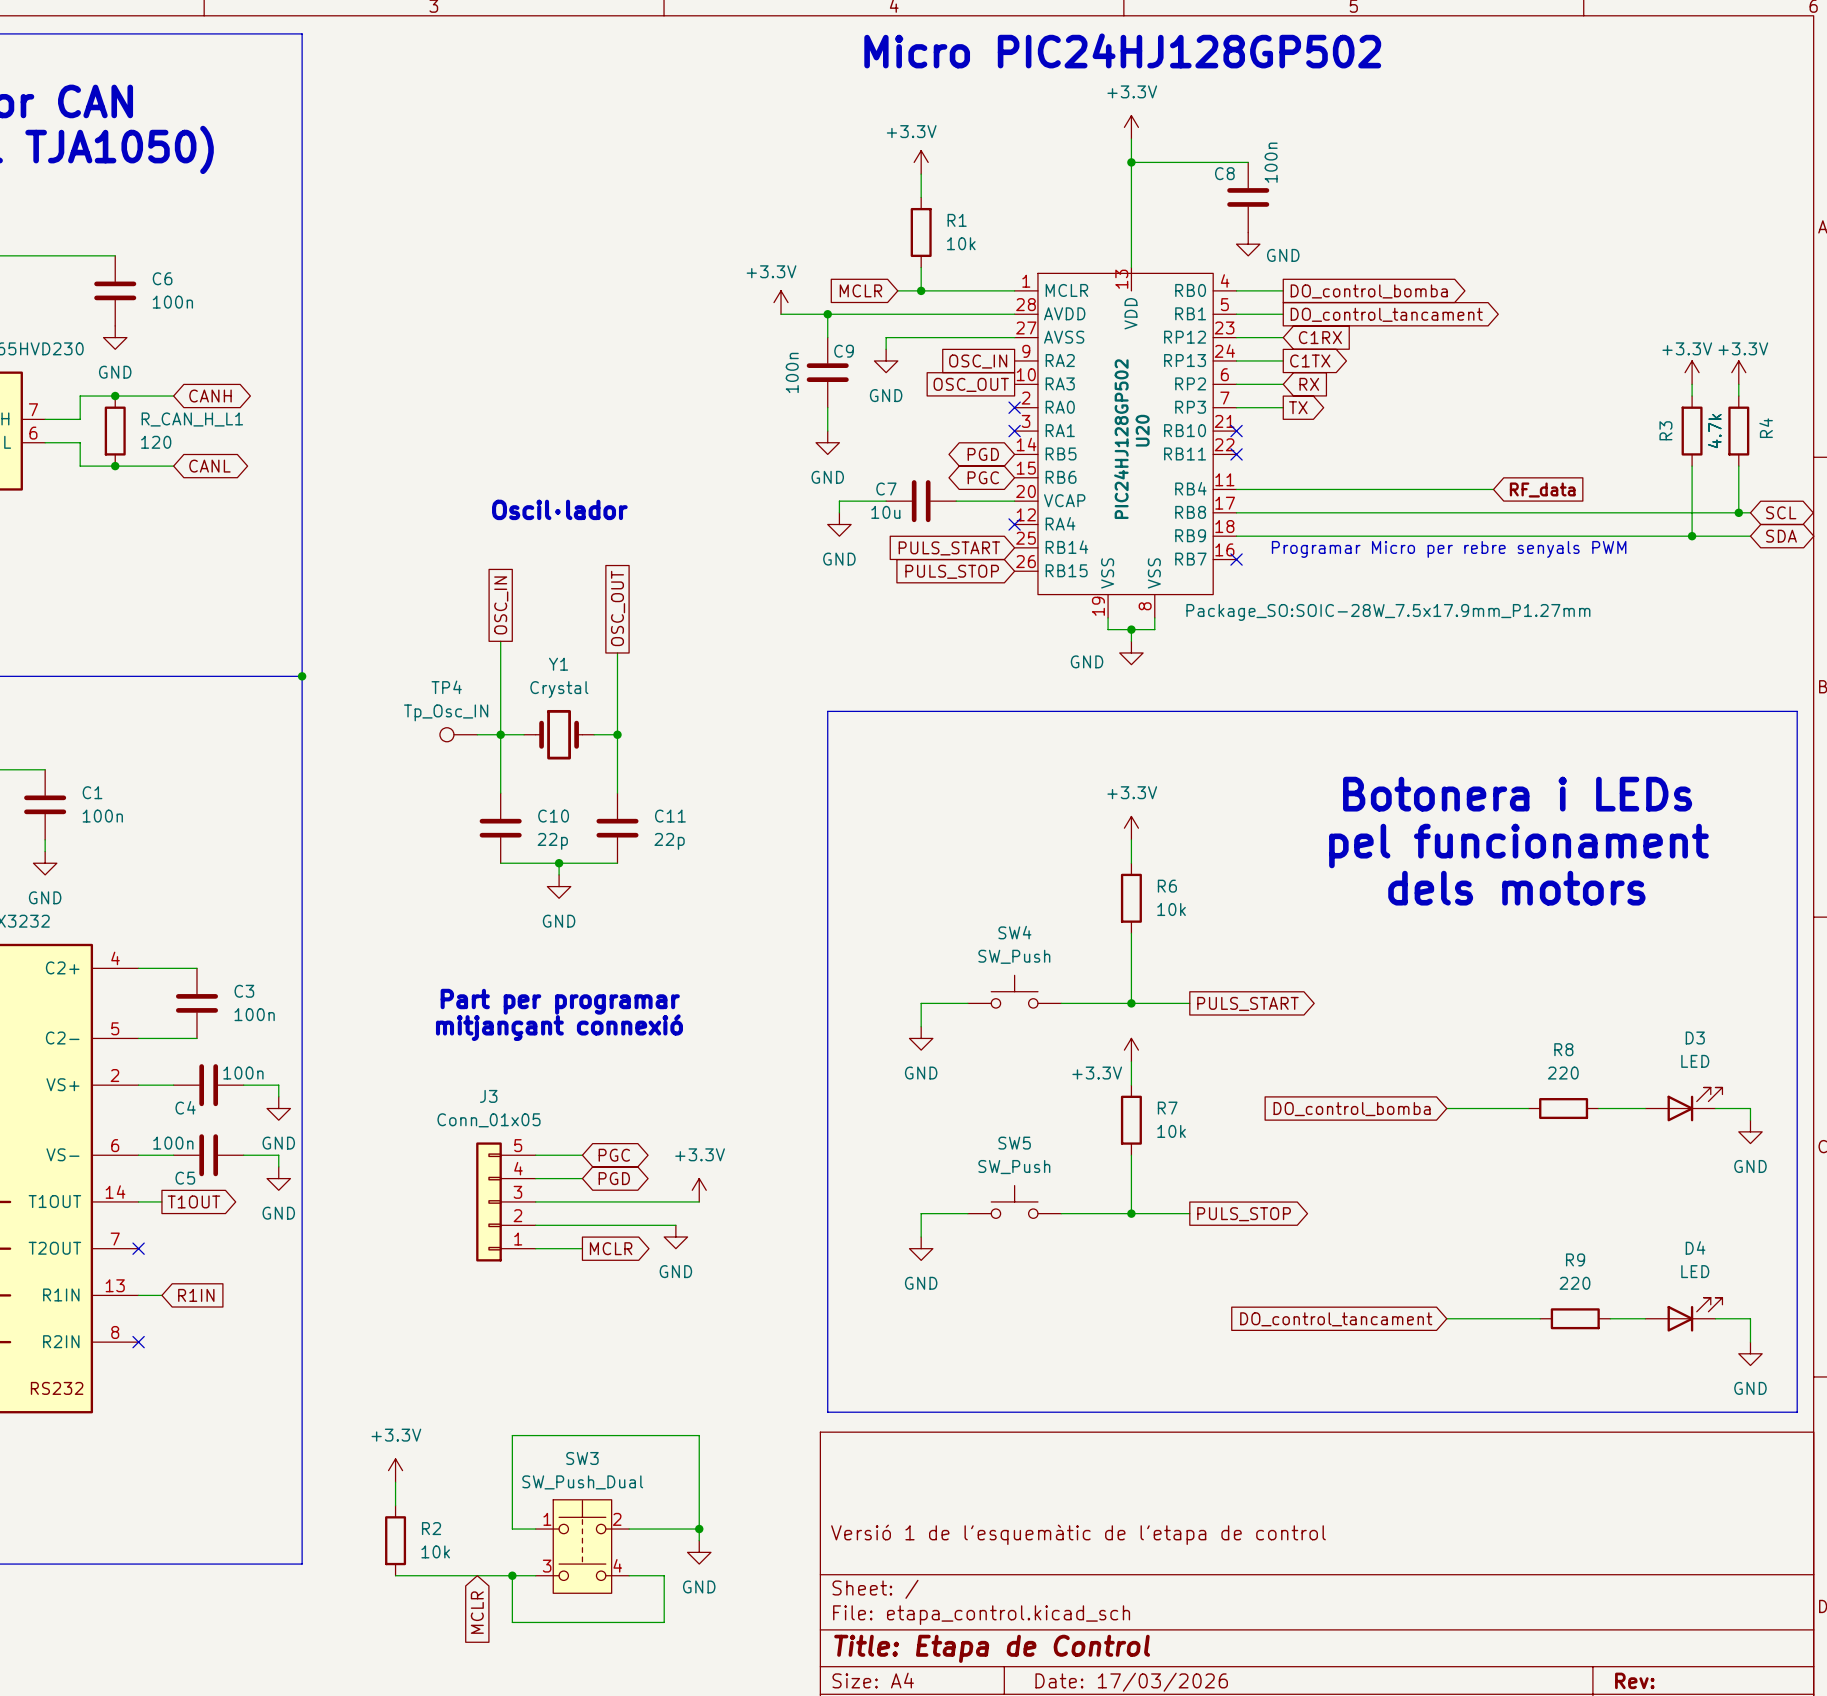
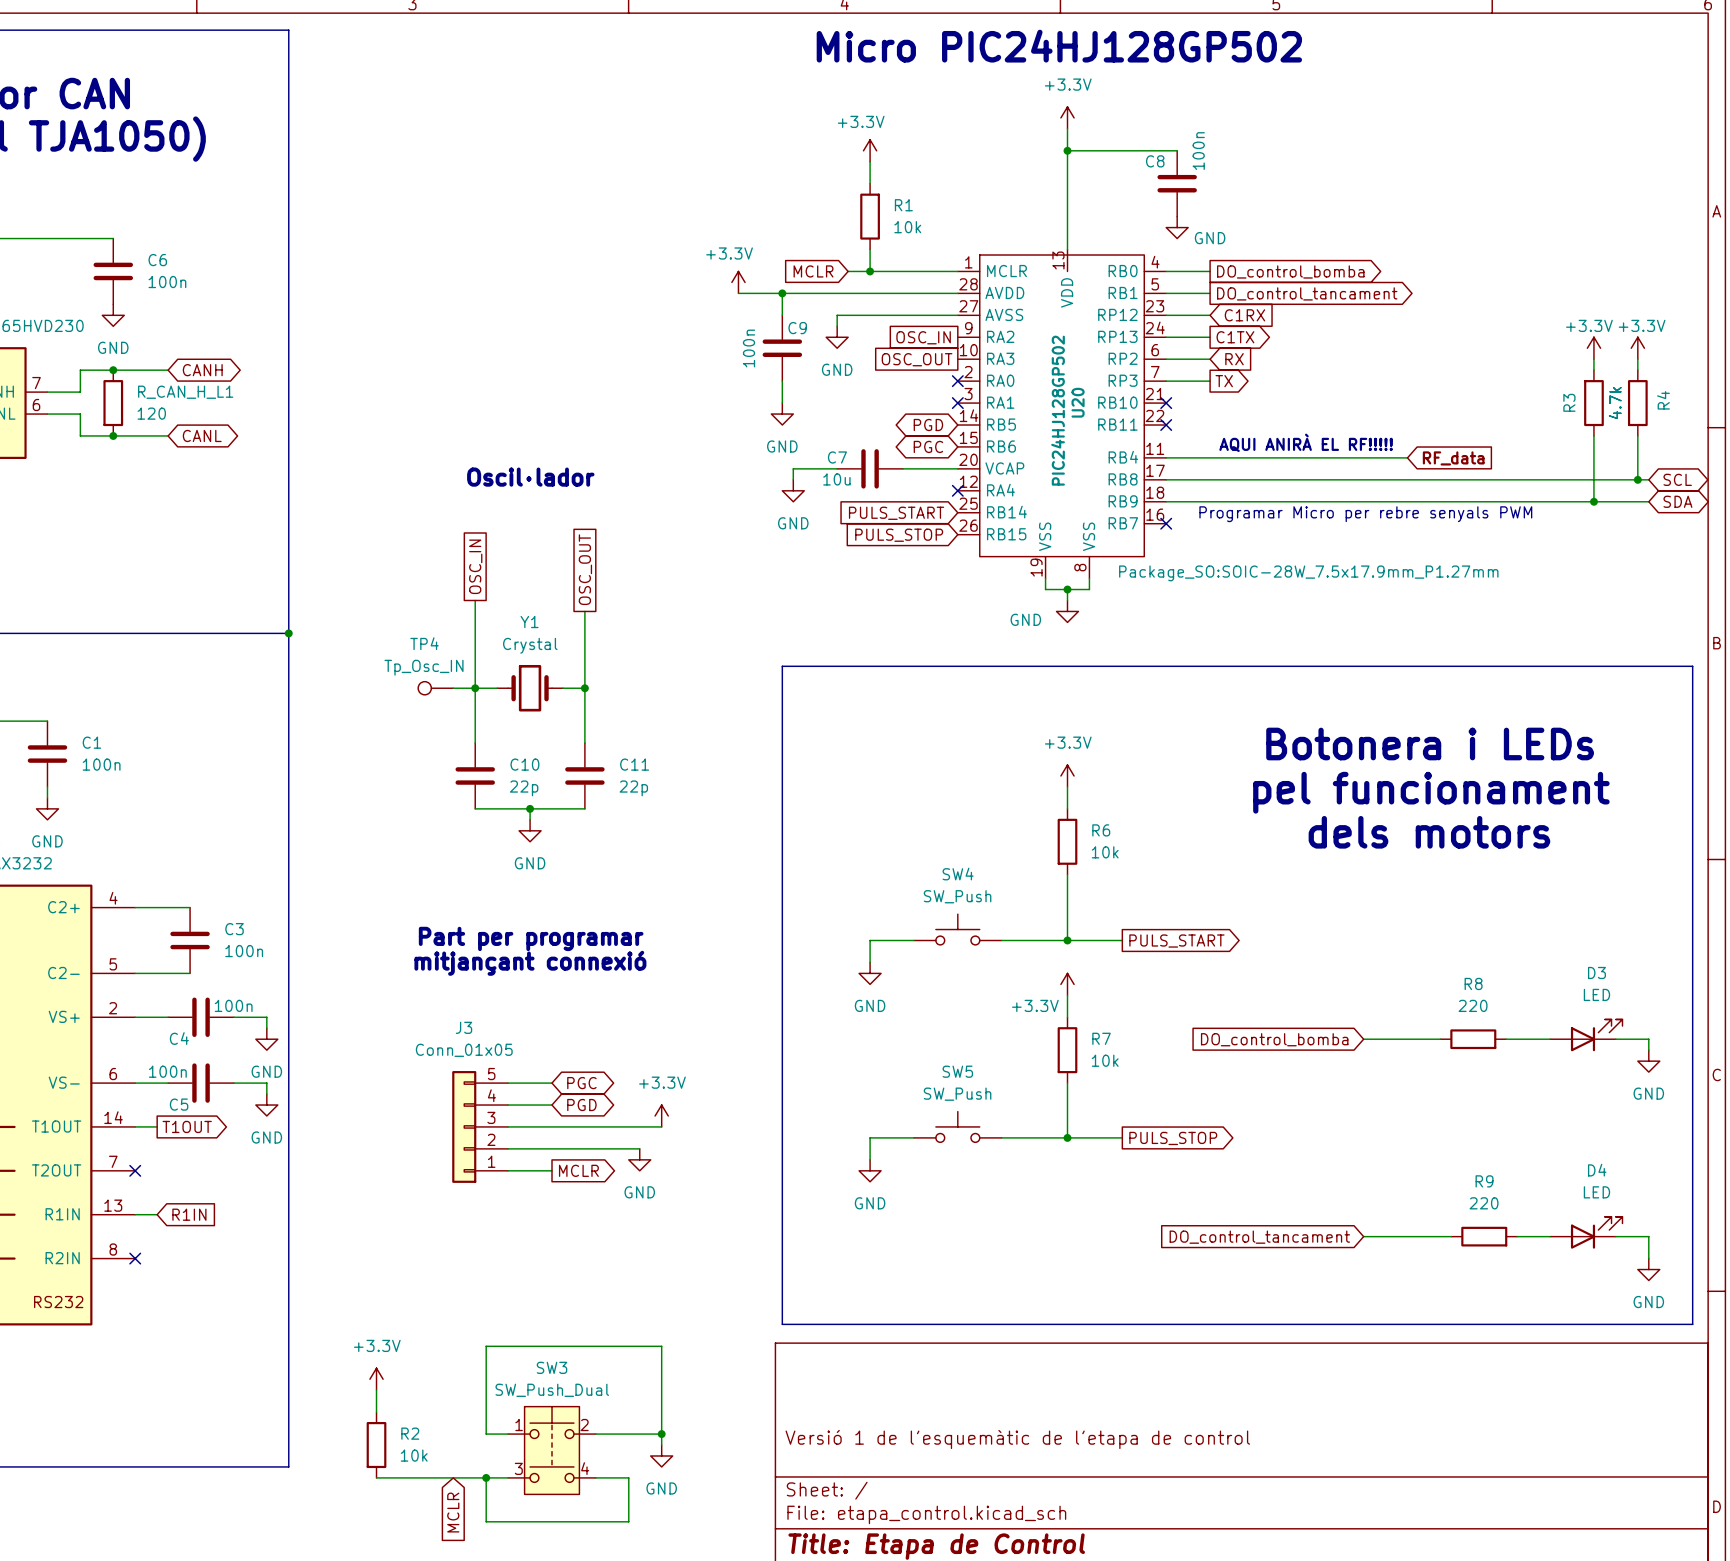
text: none -> AQUI ANIRÀ EL RF!!!!! (1306, 442)

